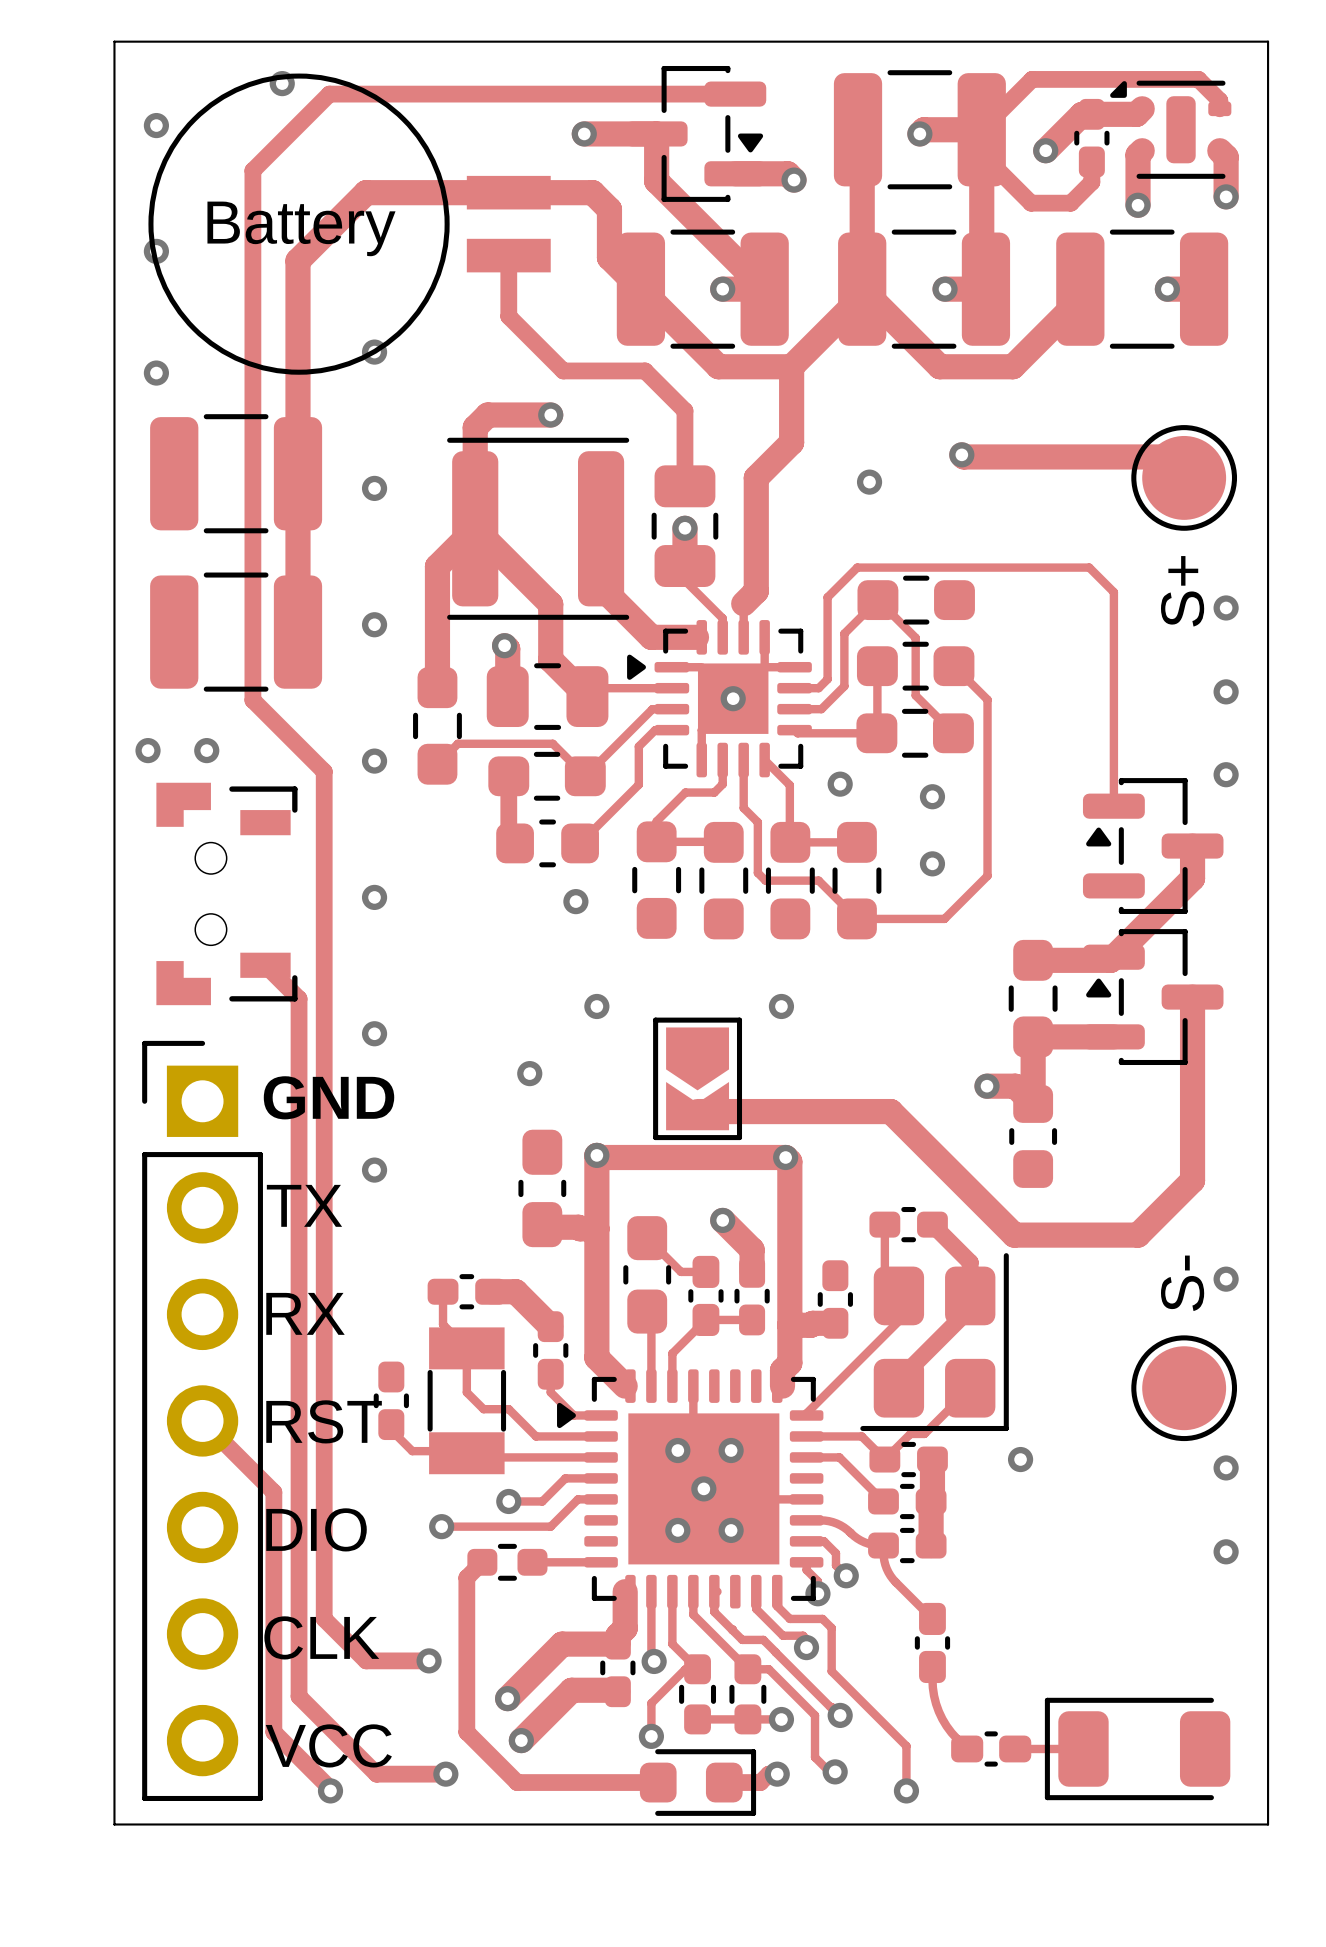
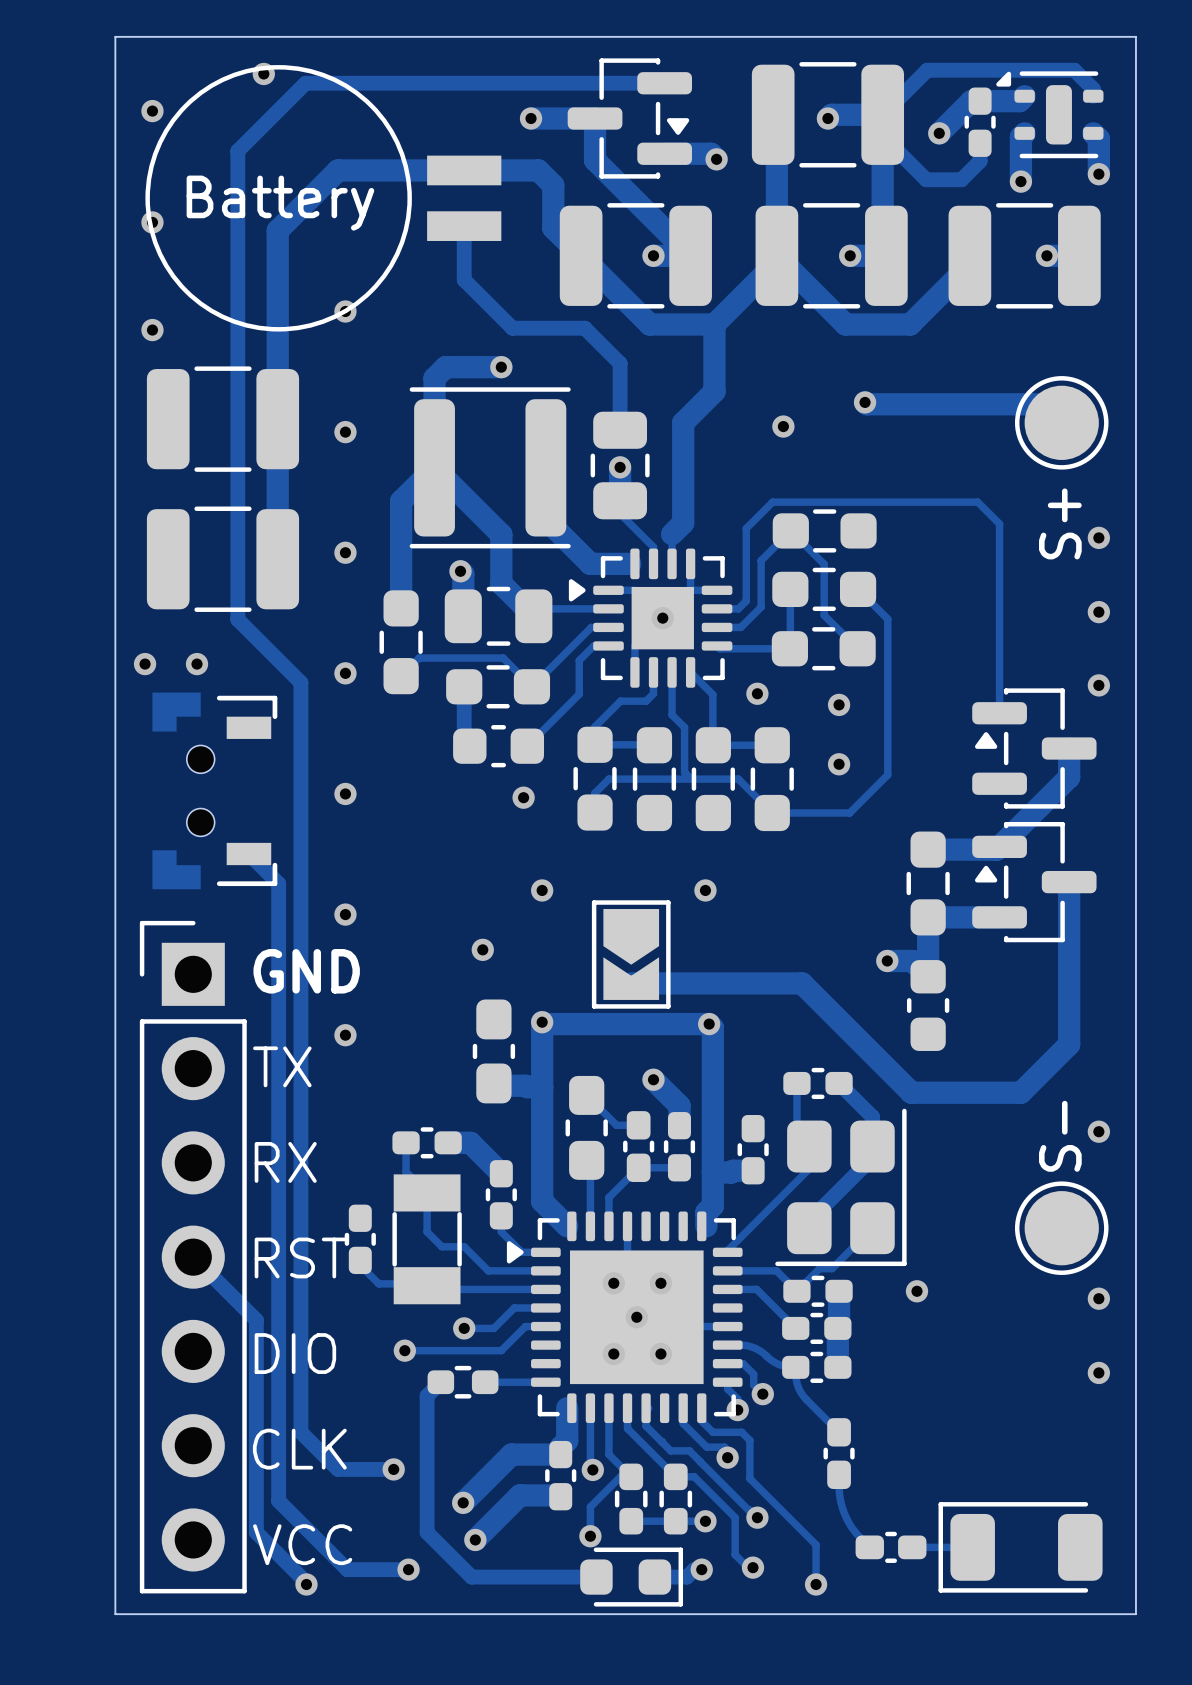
track: none -> (691, 779) (608, 779) (595, 793) (595, 812)

